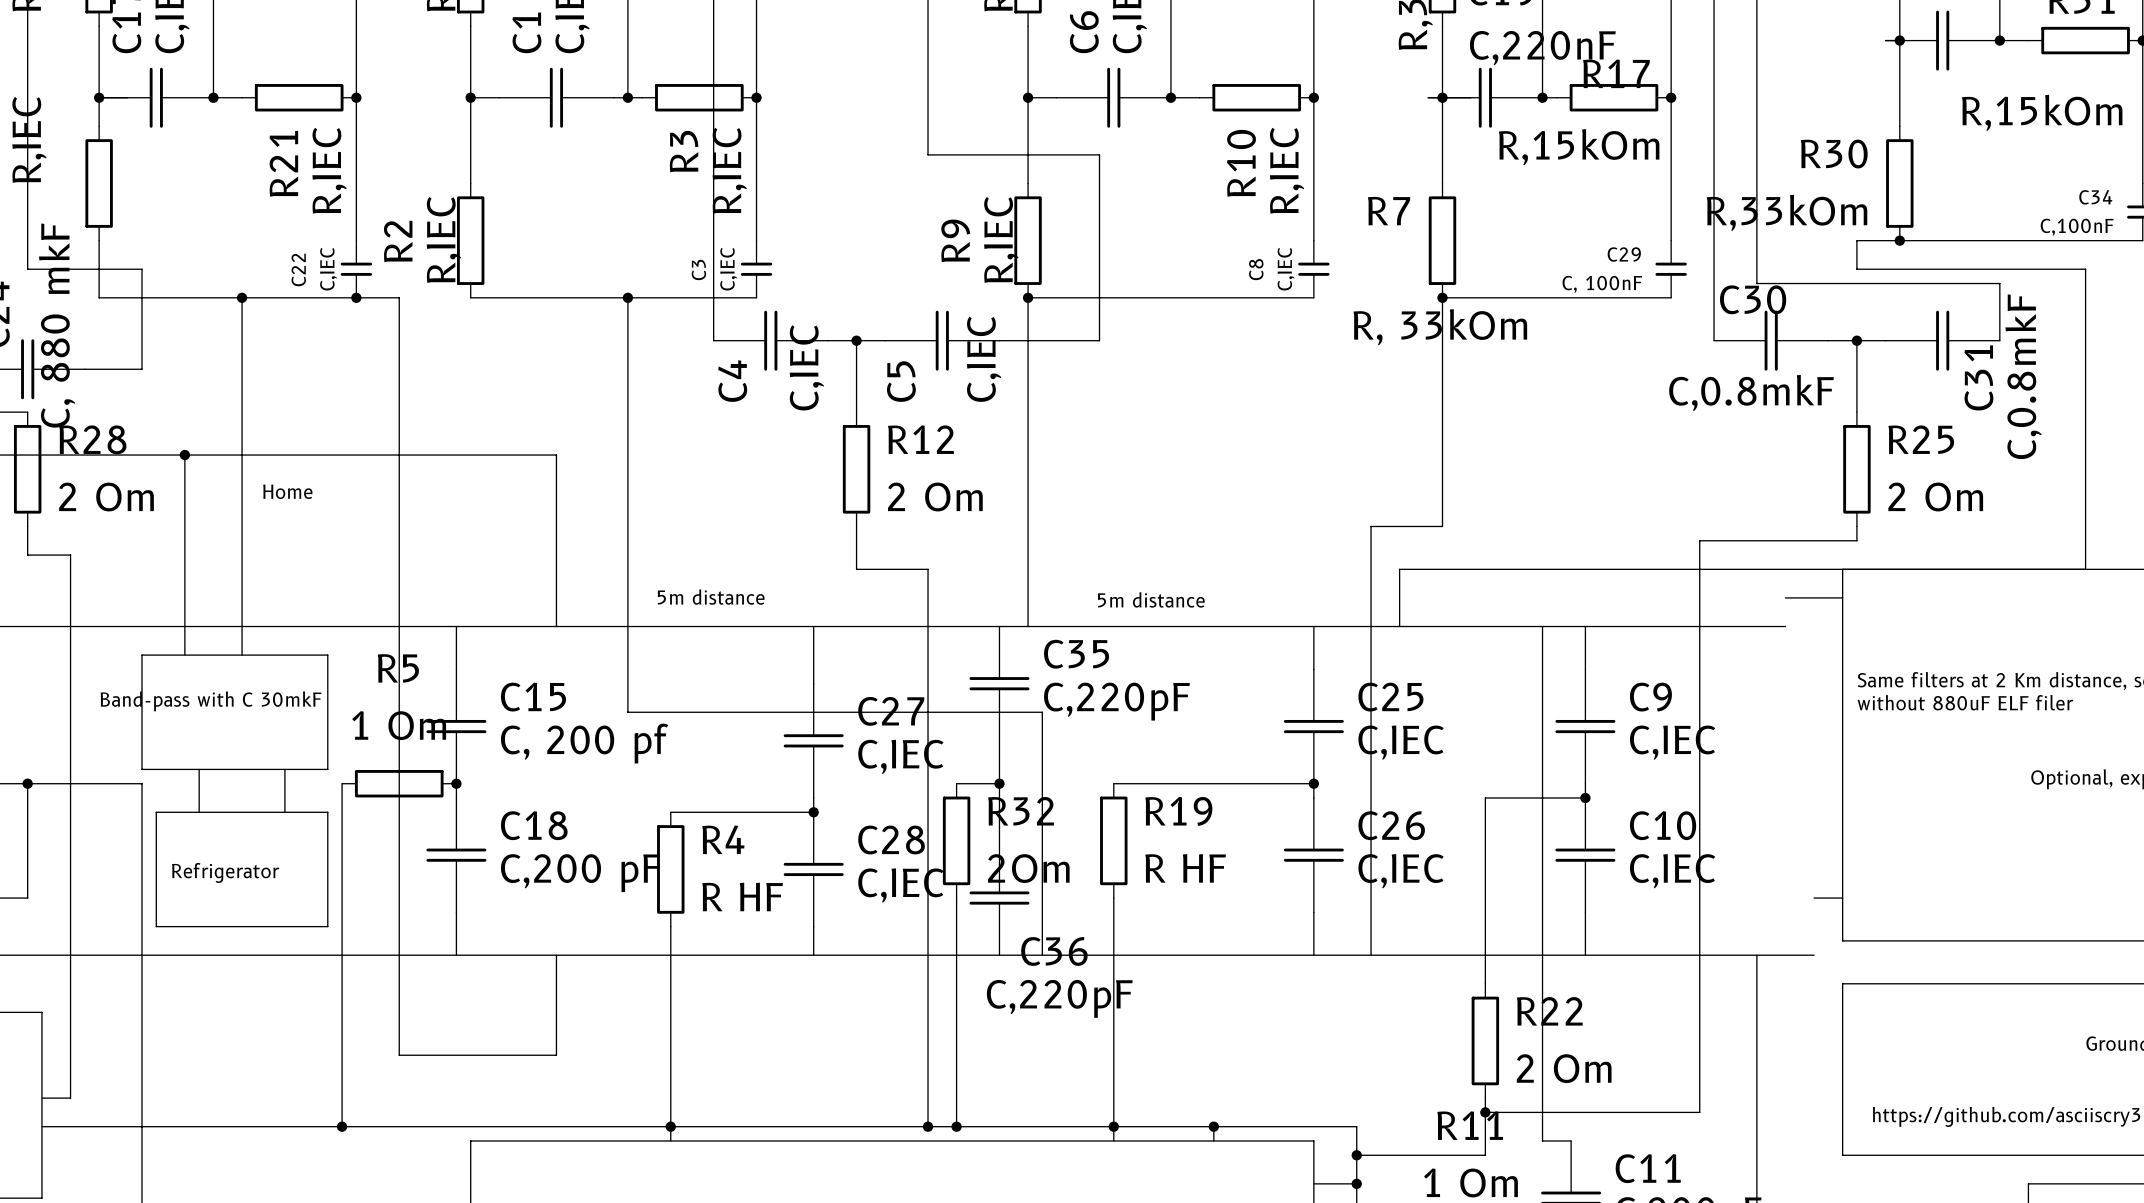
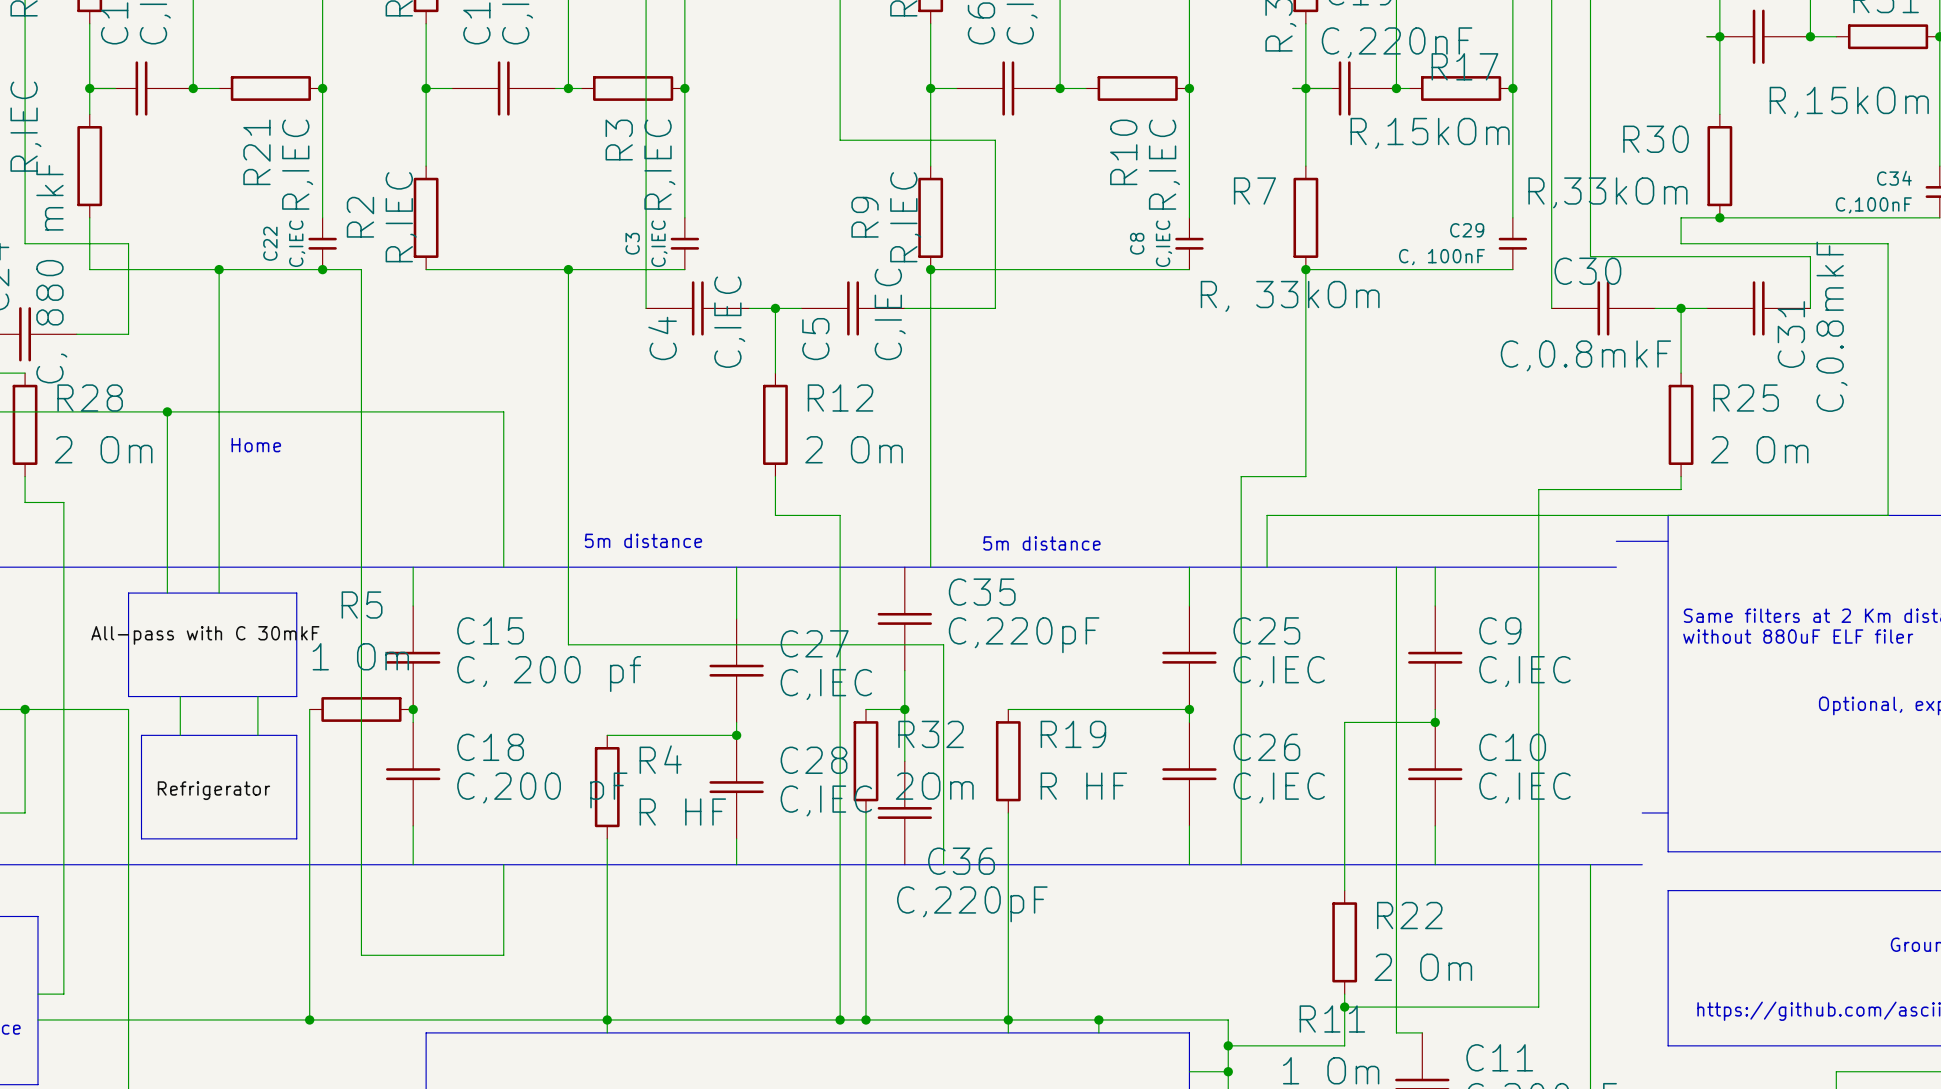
label: Band-pass with C 30mkF (211, 701) -> All-pass with C 30mkF (205, 635)

